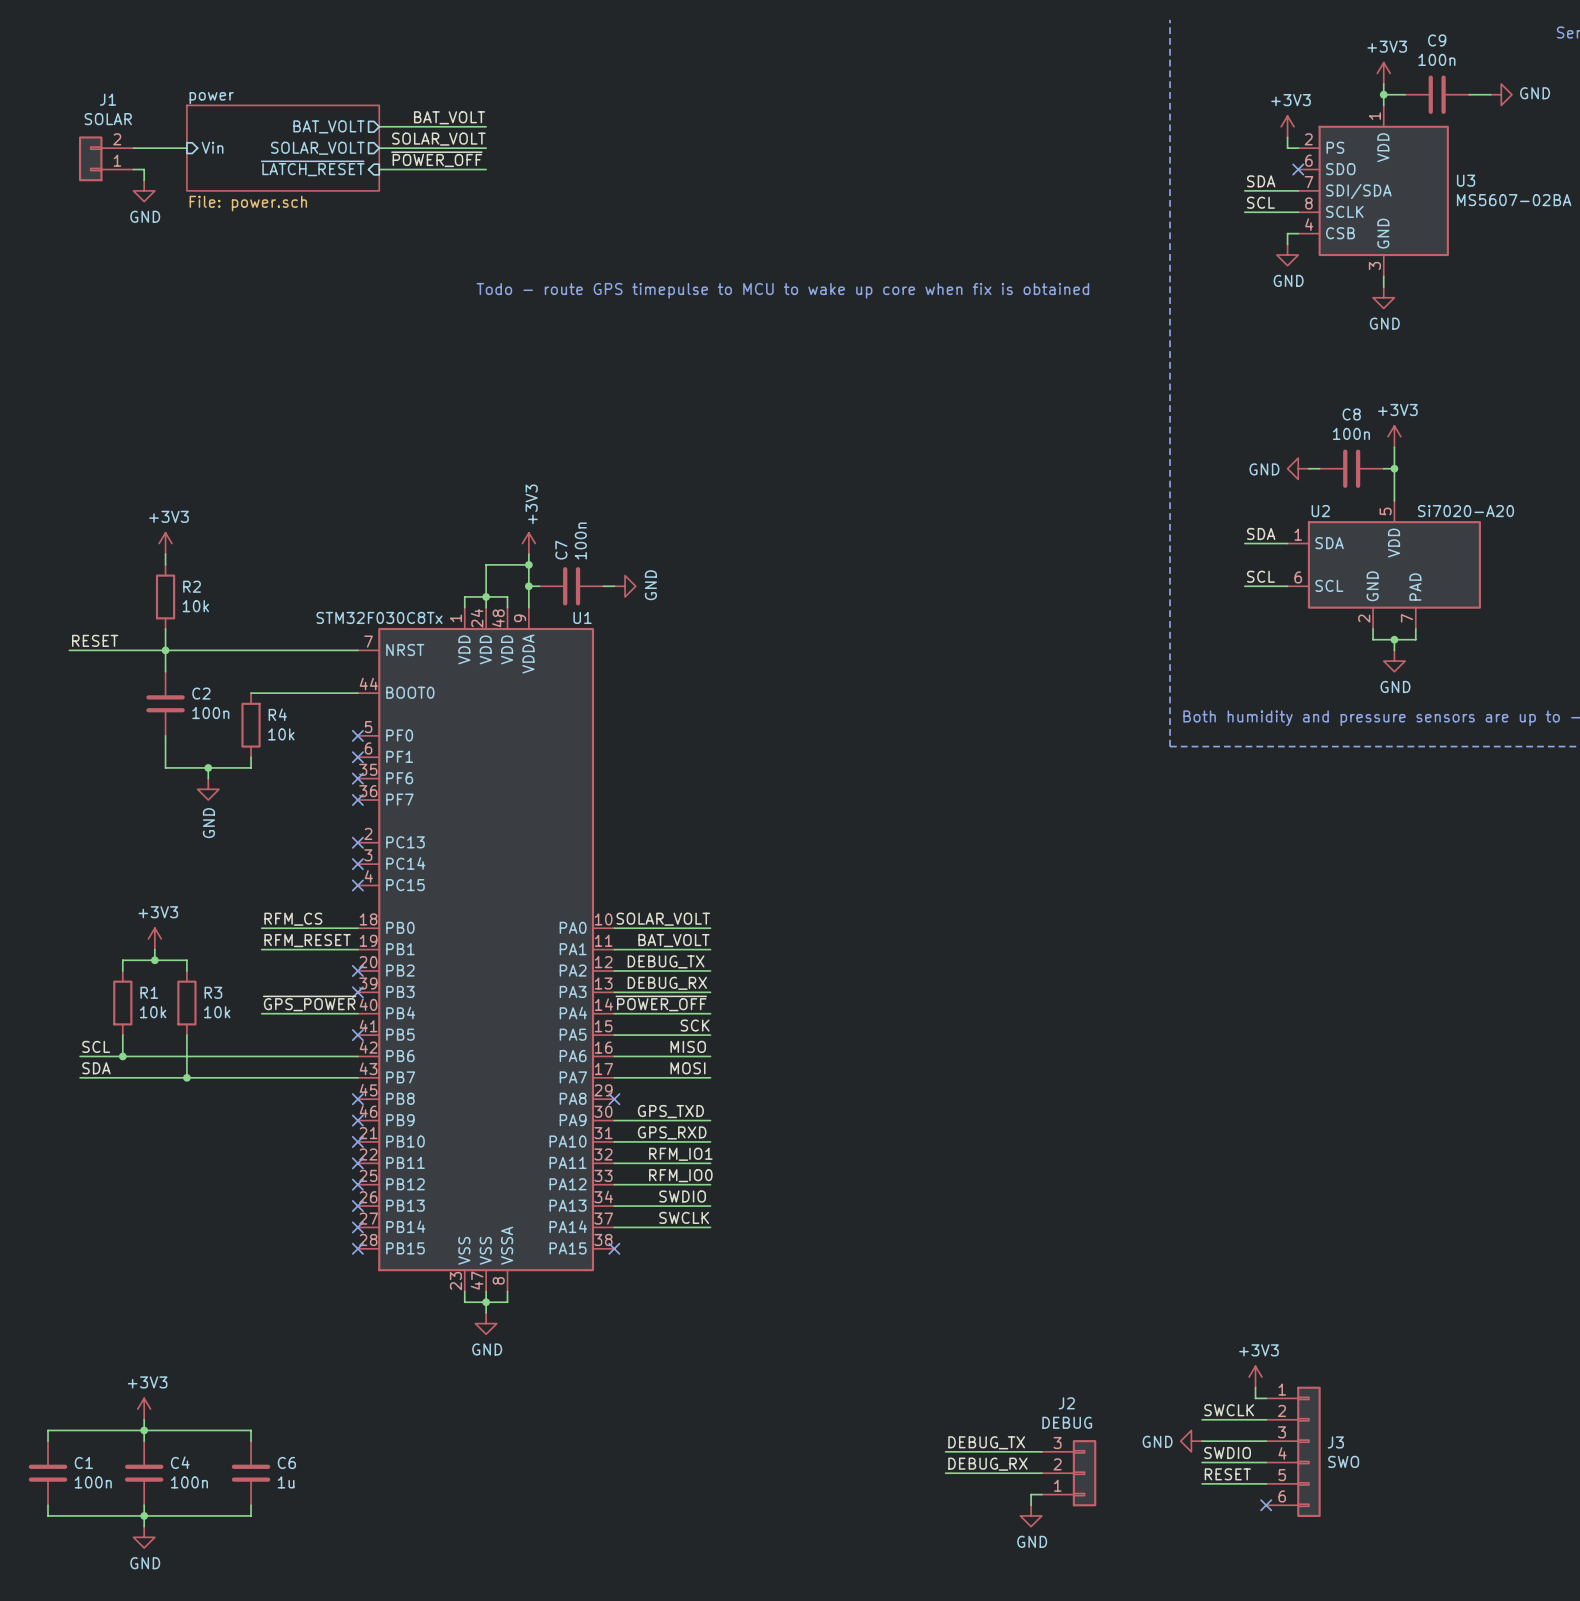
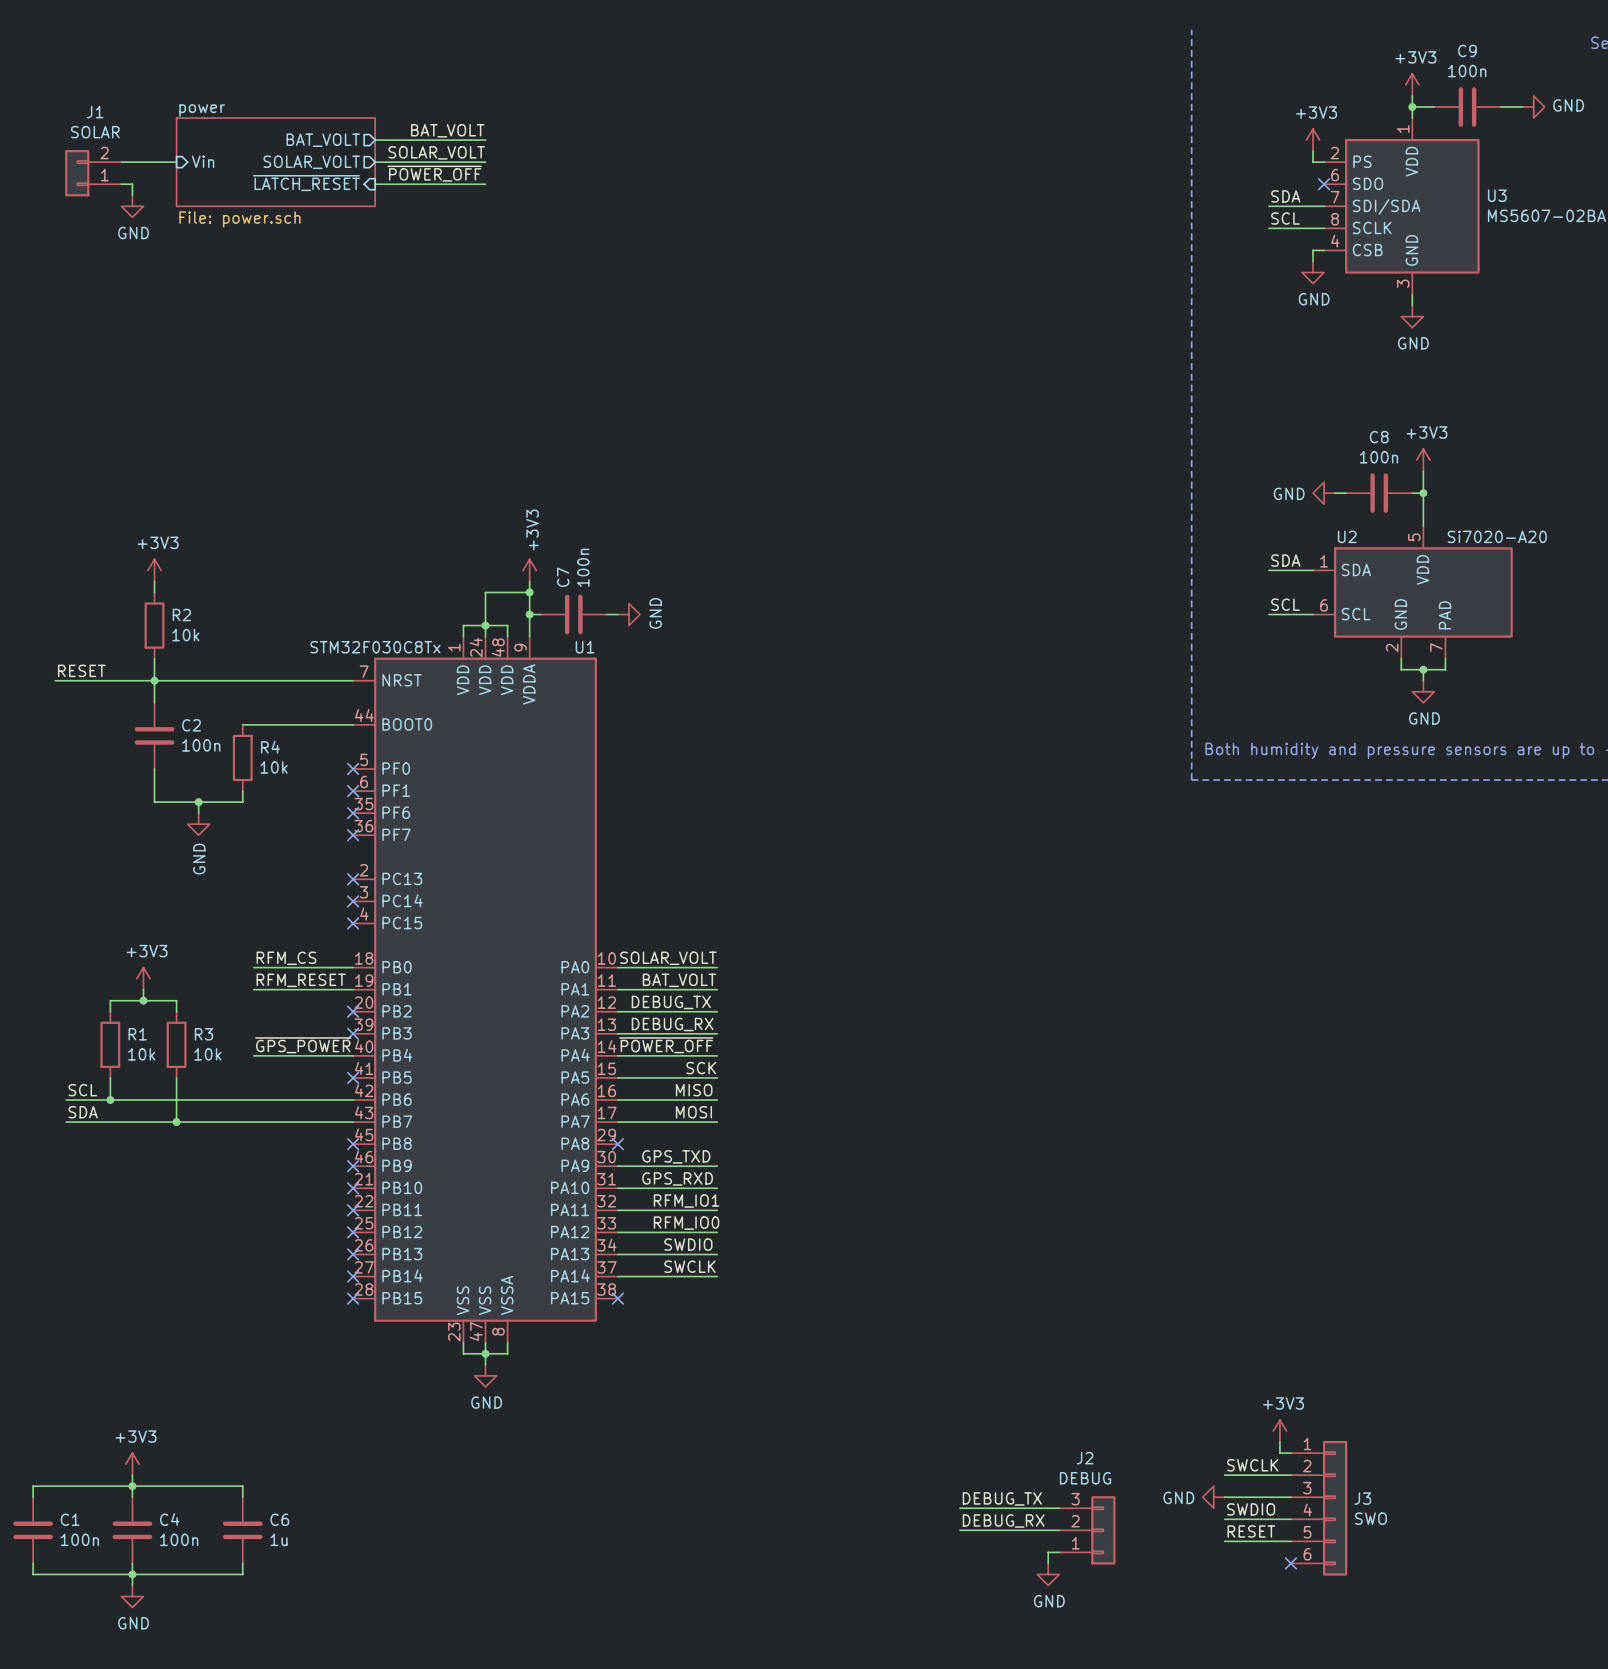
text: Todo - route GPS timepulse to MCU to wake up core when fix is obtained (782, 290) -> none

